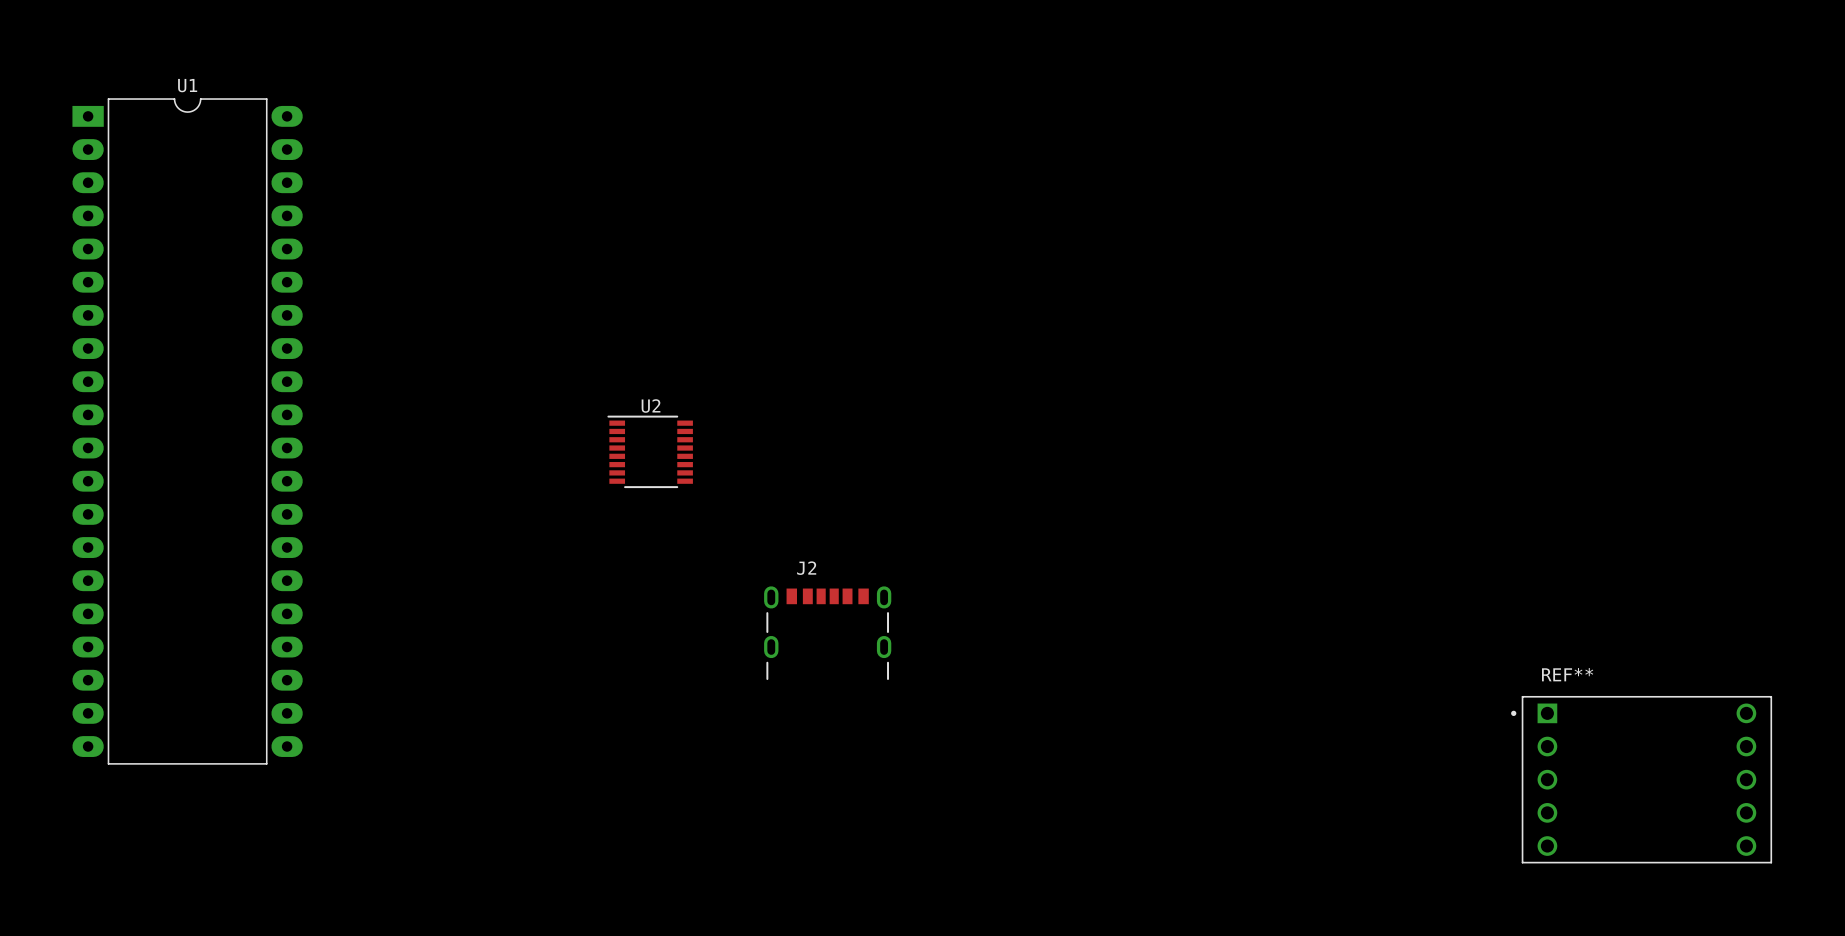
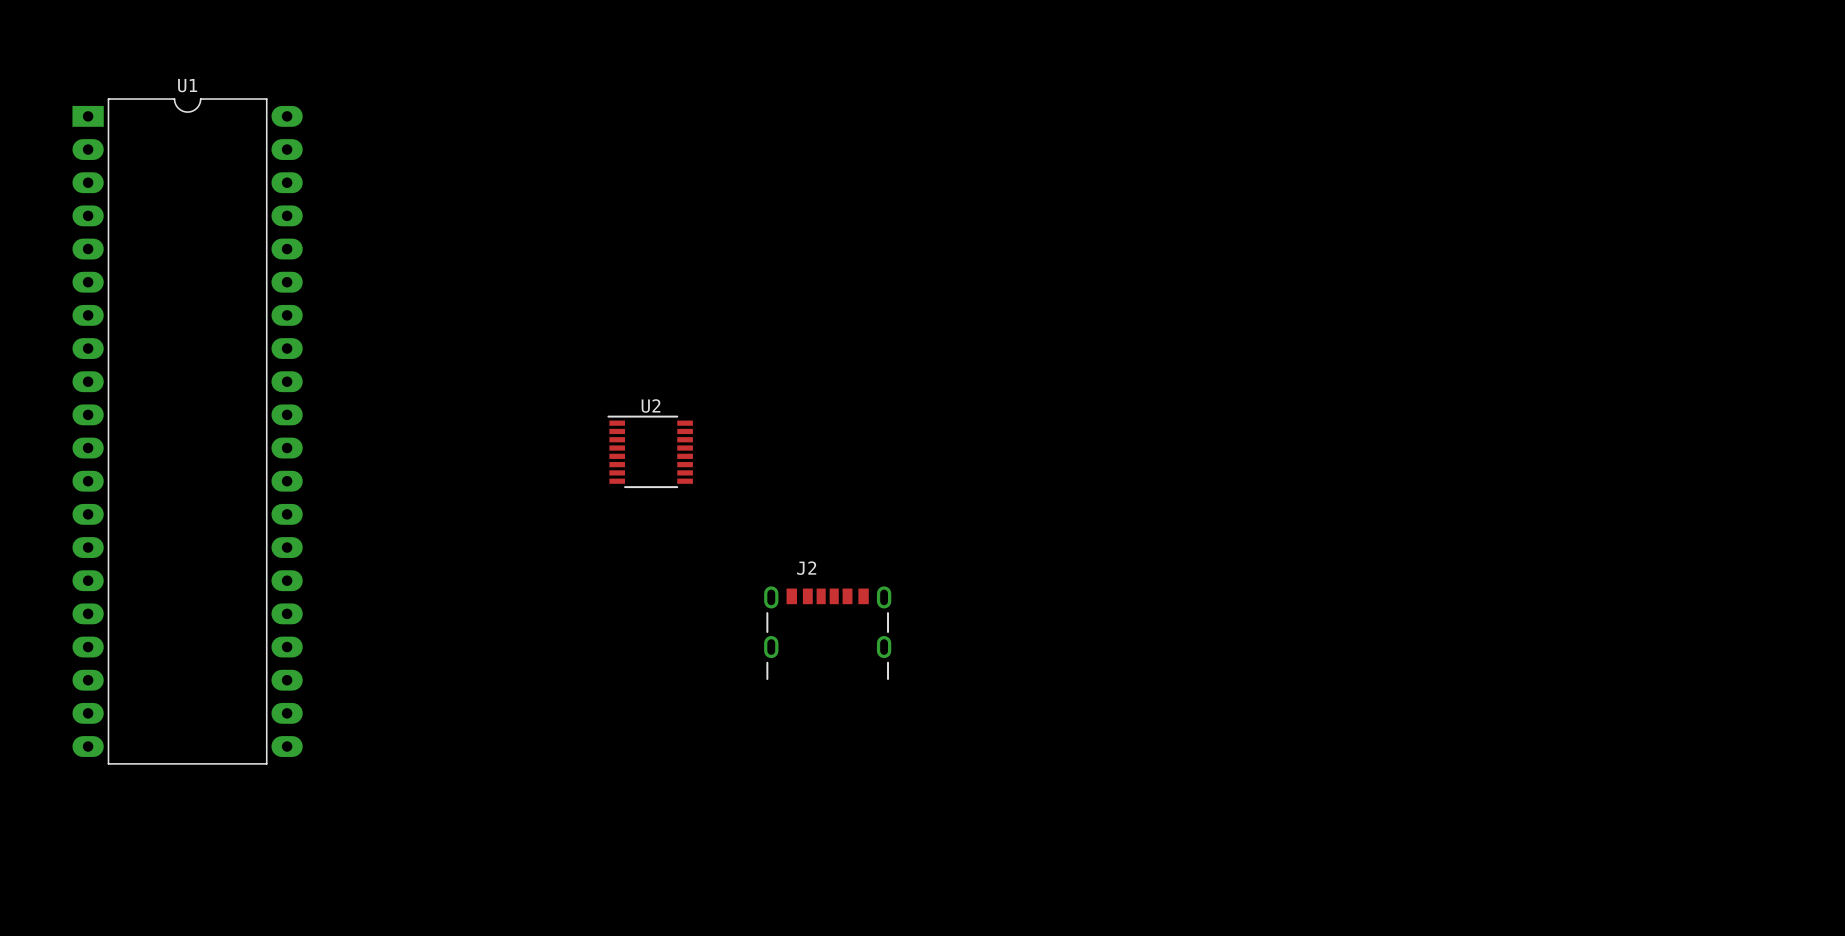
REF**: (1641, 779) -> none

